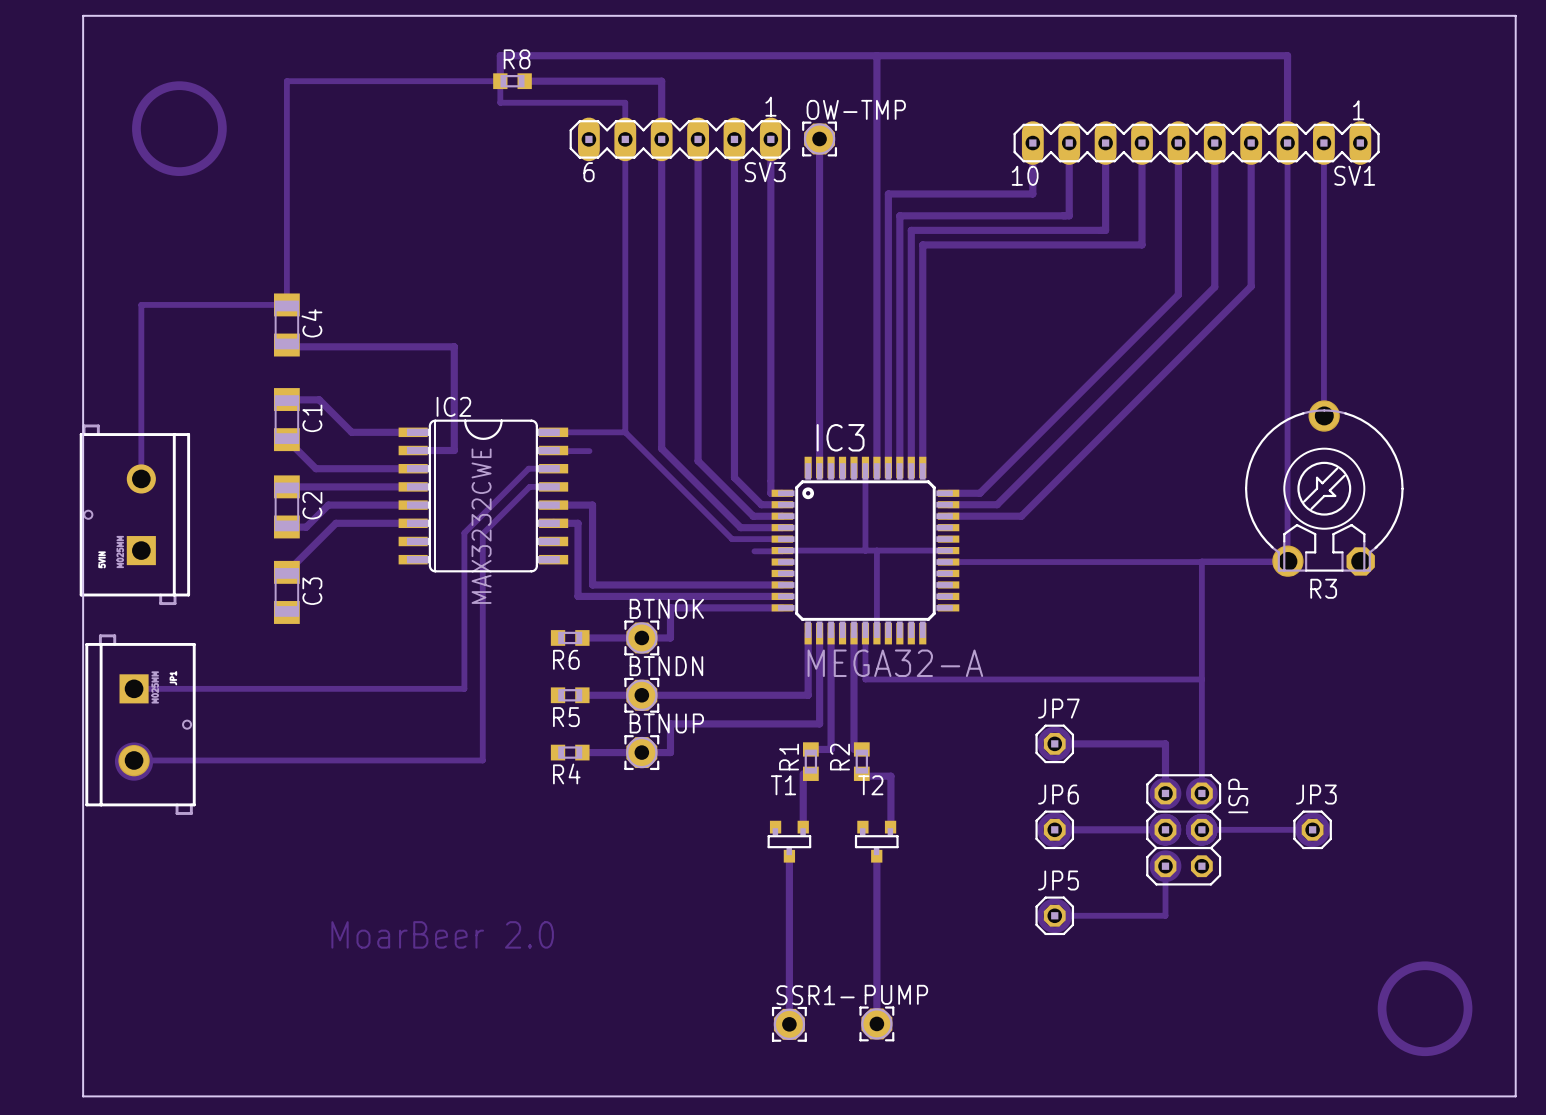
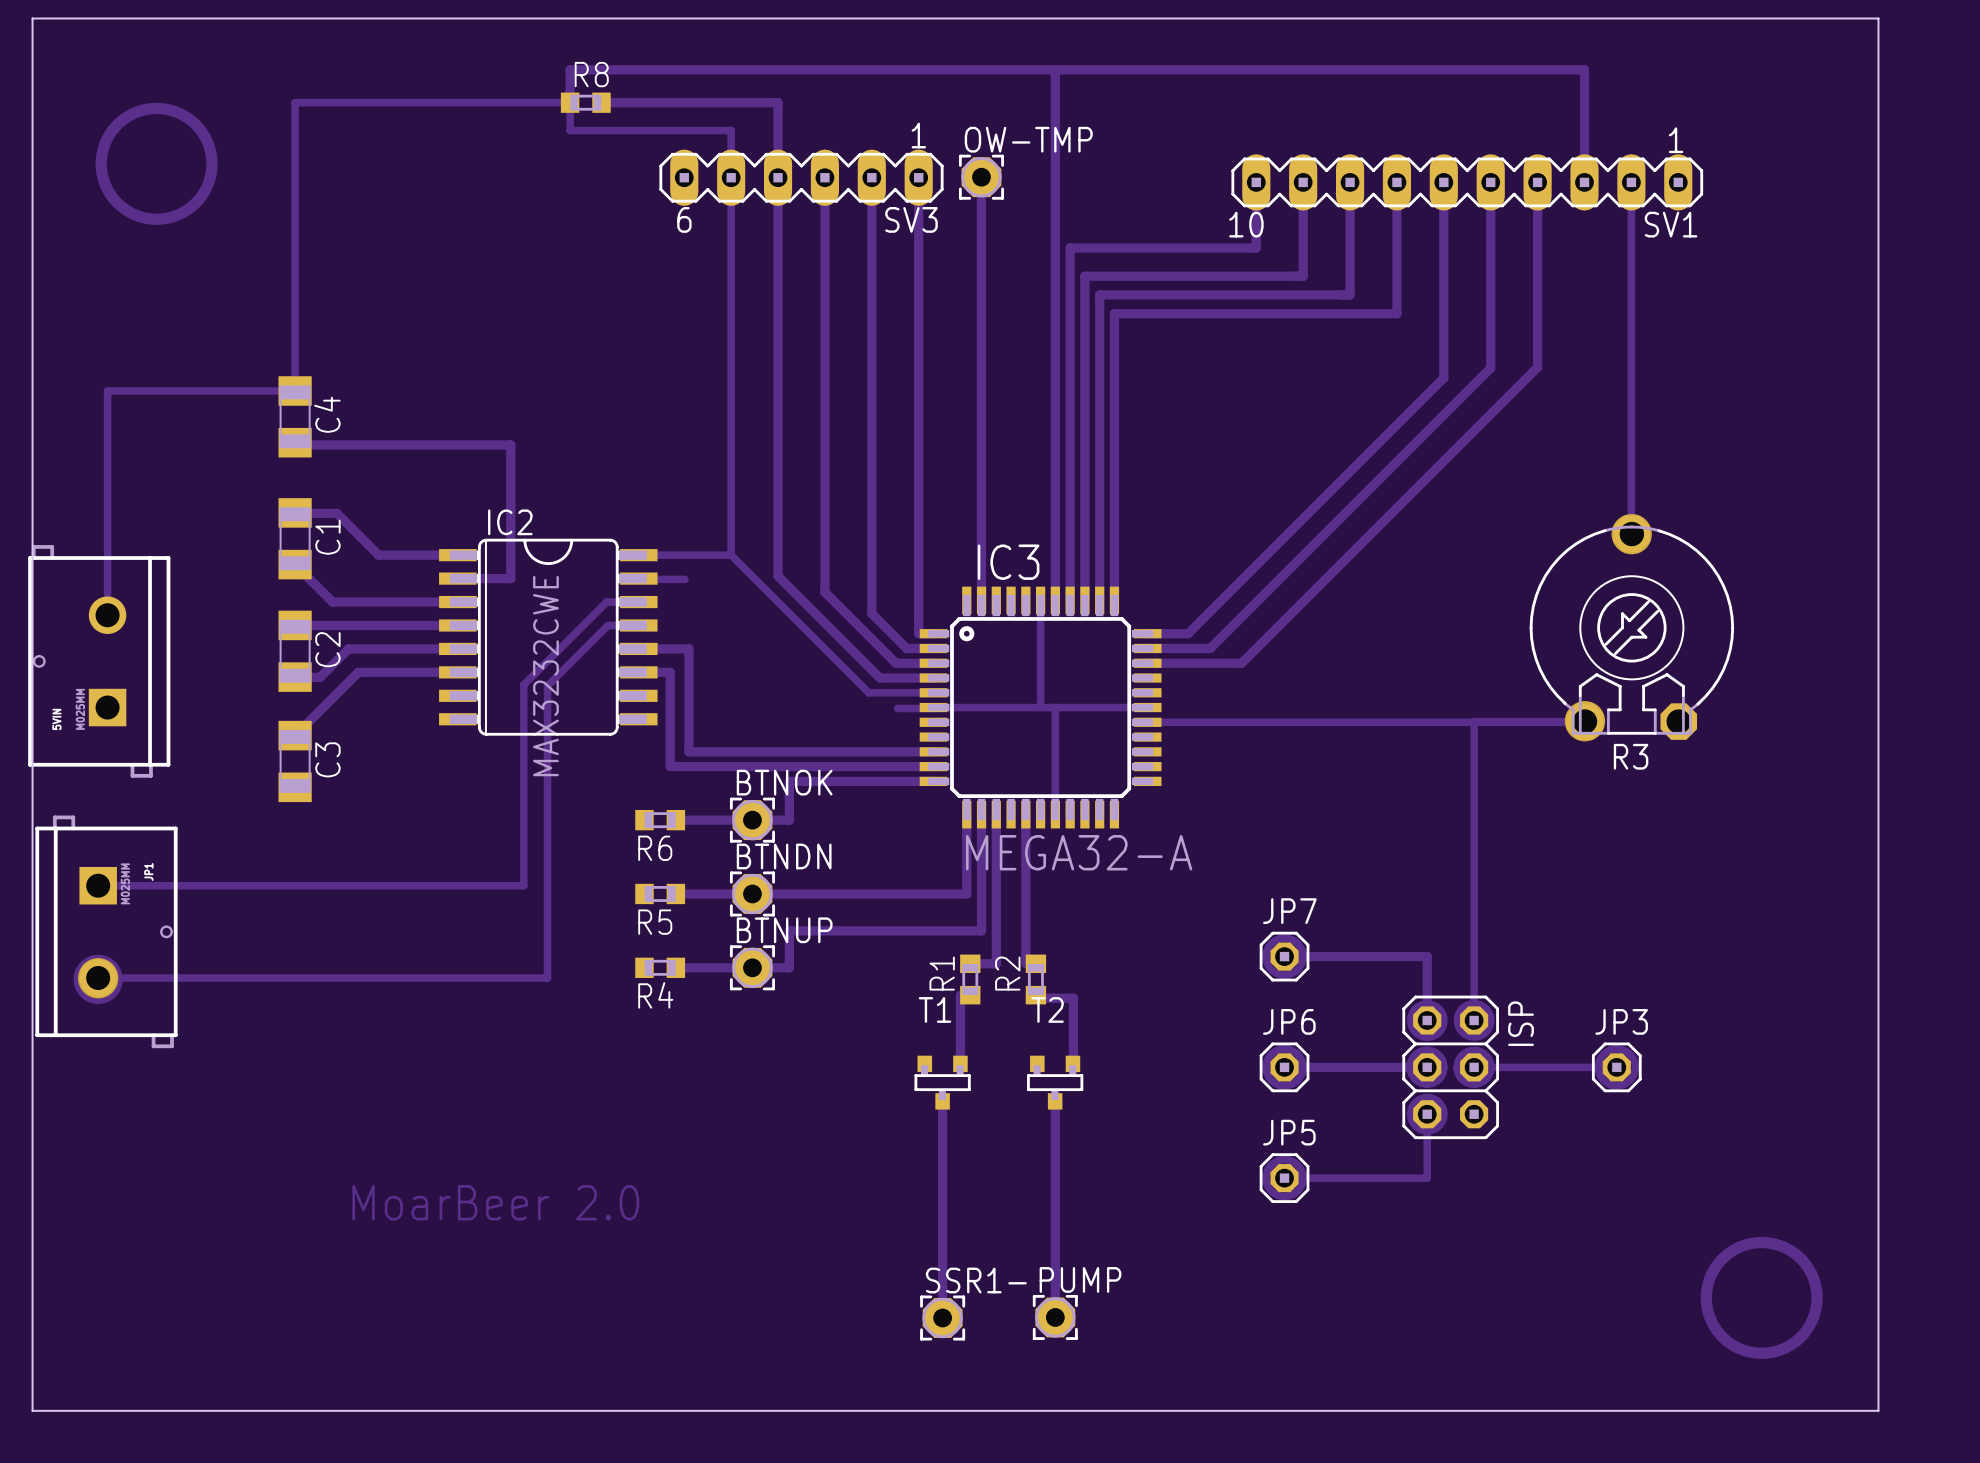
track: (1287, 143) (1287, 562) -> none
track: (865, 633) (865, 679) (1201, 679) -> none

